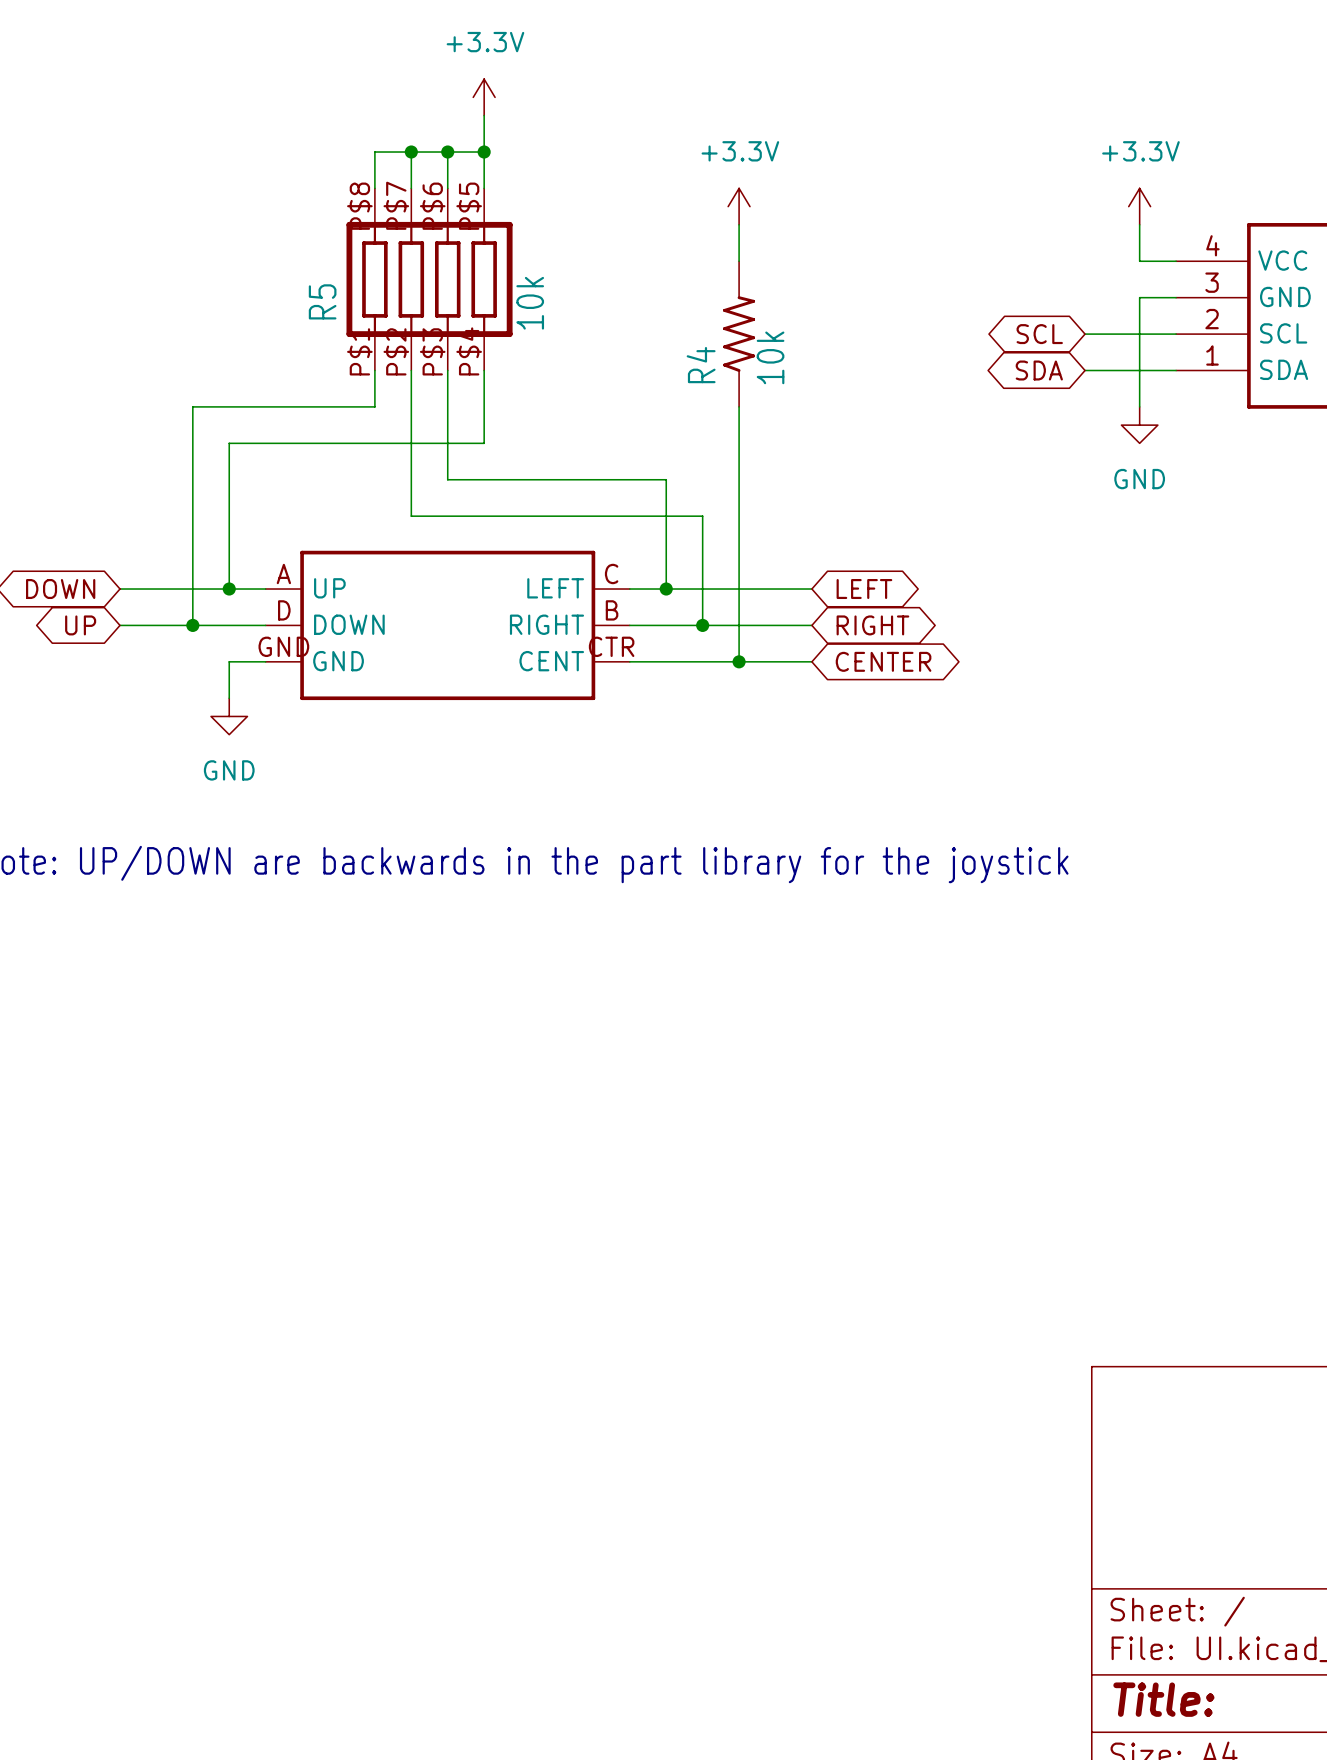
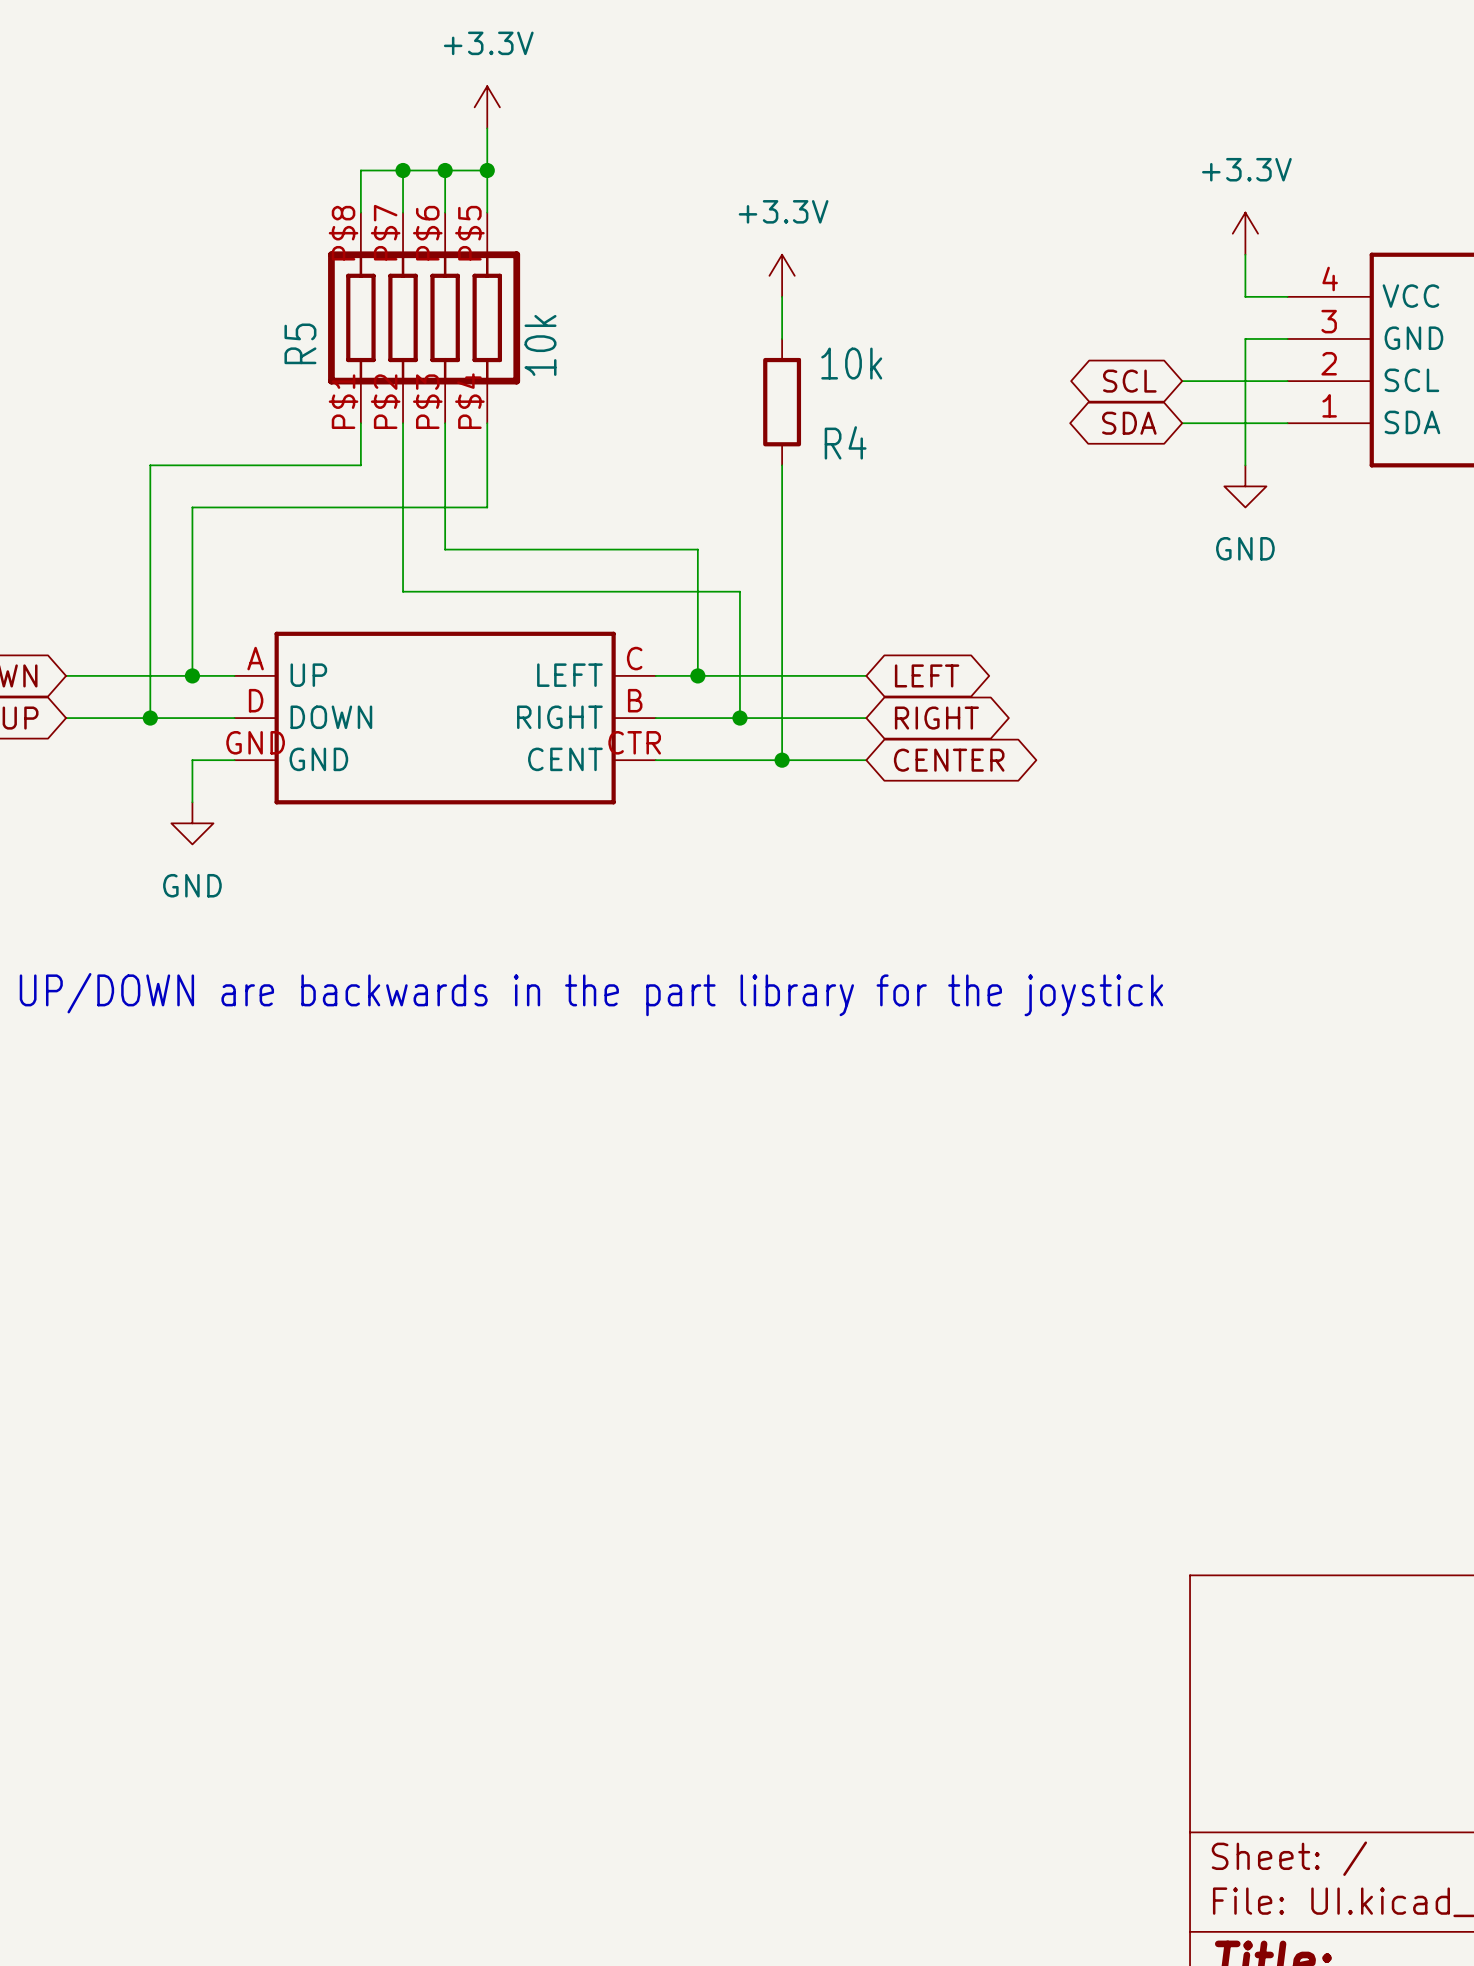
power symbol position: +3.3V (739, 206) -> +3.3V (782, 275)
R4 symbol: [723, 261, 756, 407] -> [763, 338, 802, 466]
R4 value position: 10k (770, 357) -> 10k (851, 363)
R4 name position: R4 (701, 365) -> R4 (845, 442)

